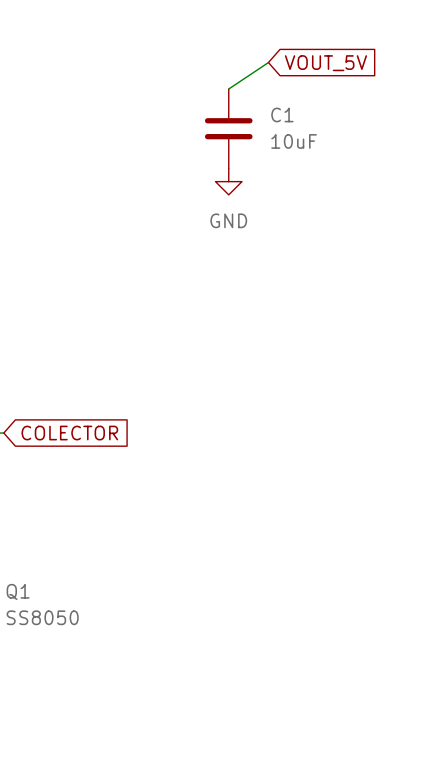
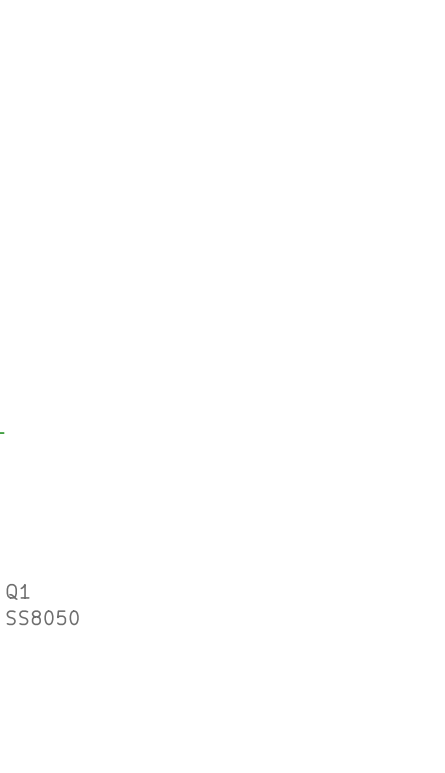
wire: (268, 62) (228, 89) -> none
global label: VOUT_5V (325, 63) -> none
C1: 10uF (228, 128) -> none
power symbol: GND (228, 181) -> none
global label: COLECTOR (69, 433) -> none

